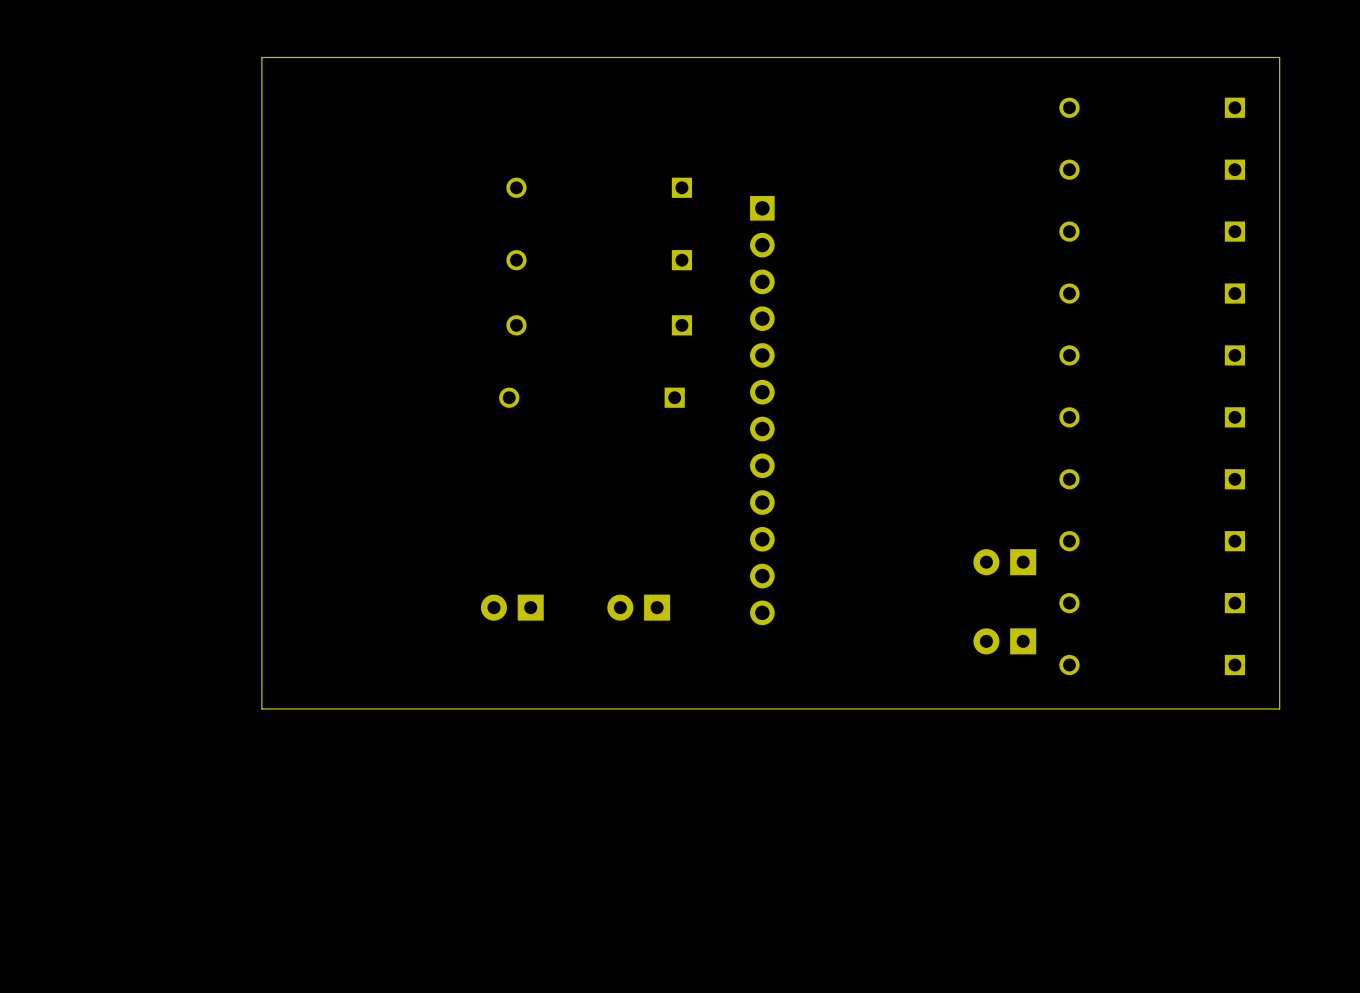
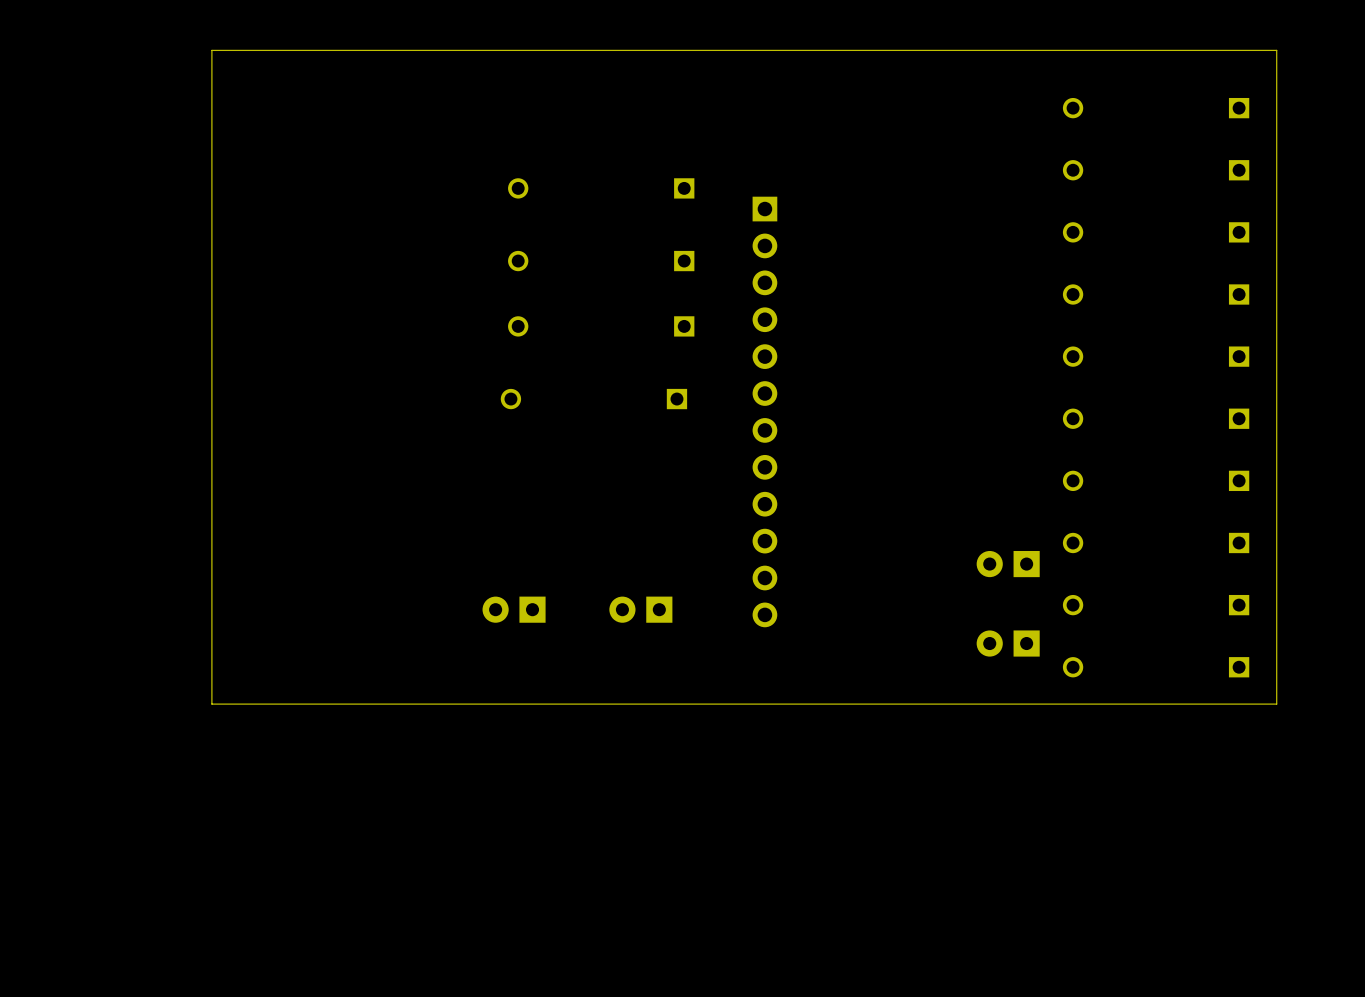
board edge: (1279, 57) (261, 57) (261, 708) (1279, 708) (1279, 57) -> (1276, 50) (1276, 704) (211, 704) (211, 50) (1276, 50)

